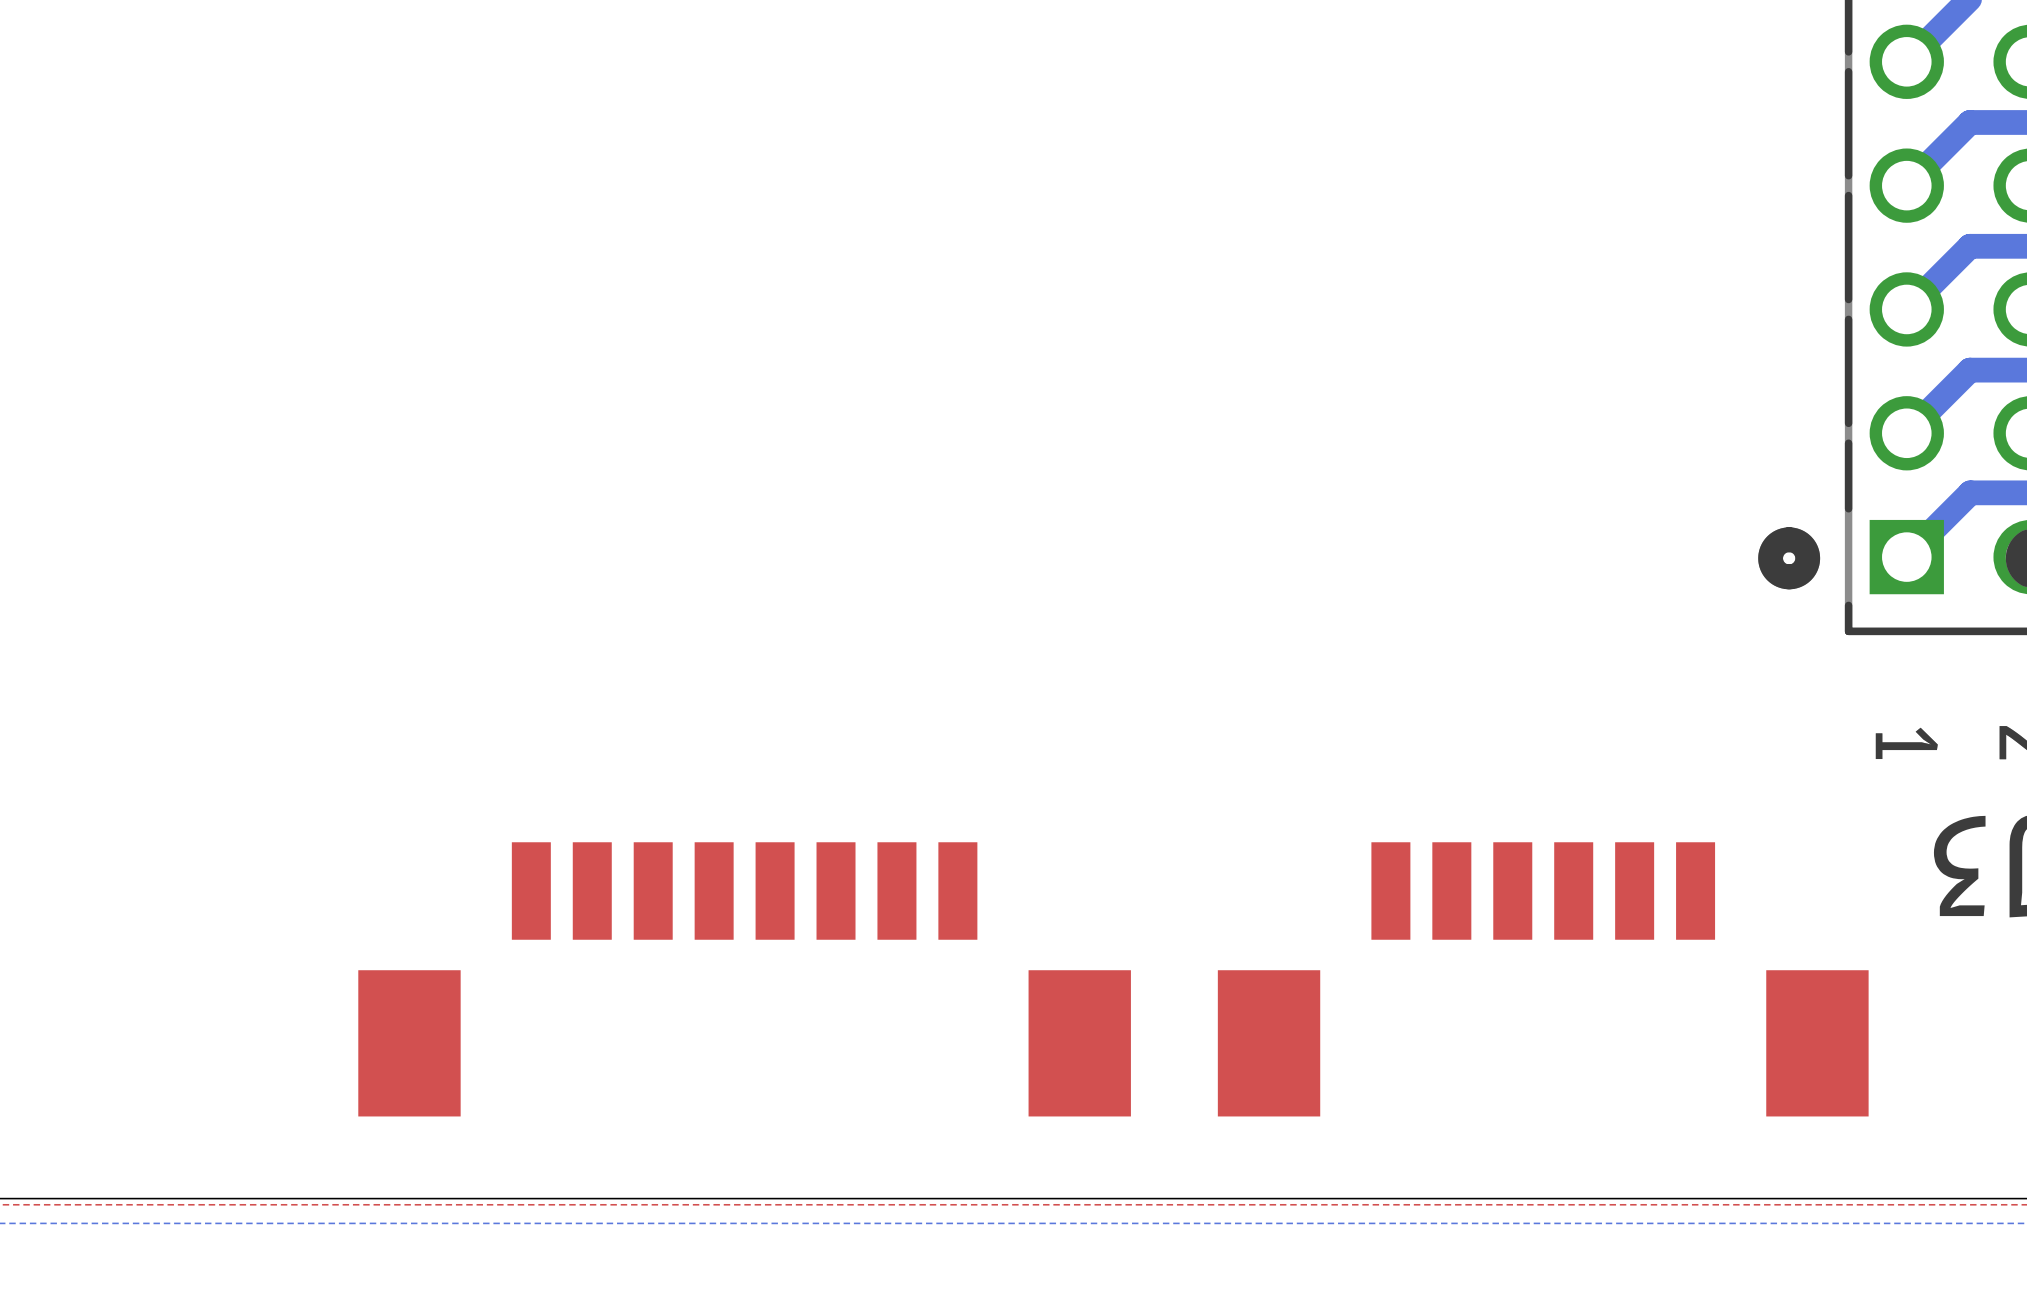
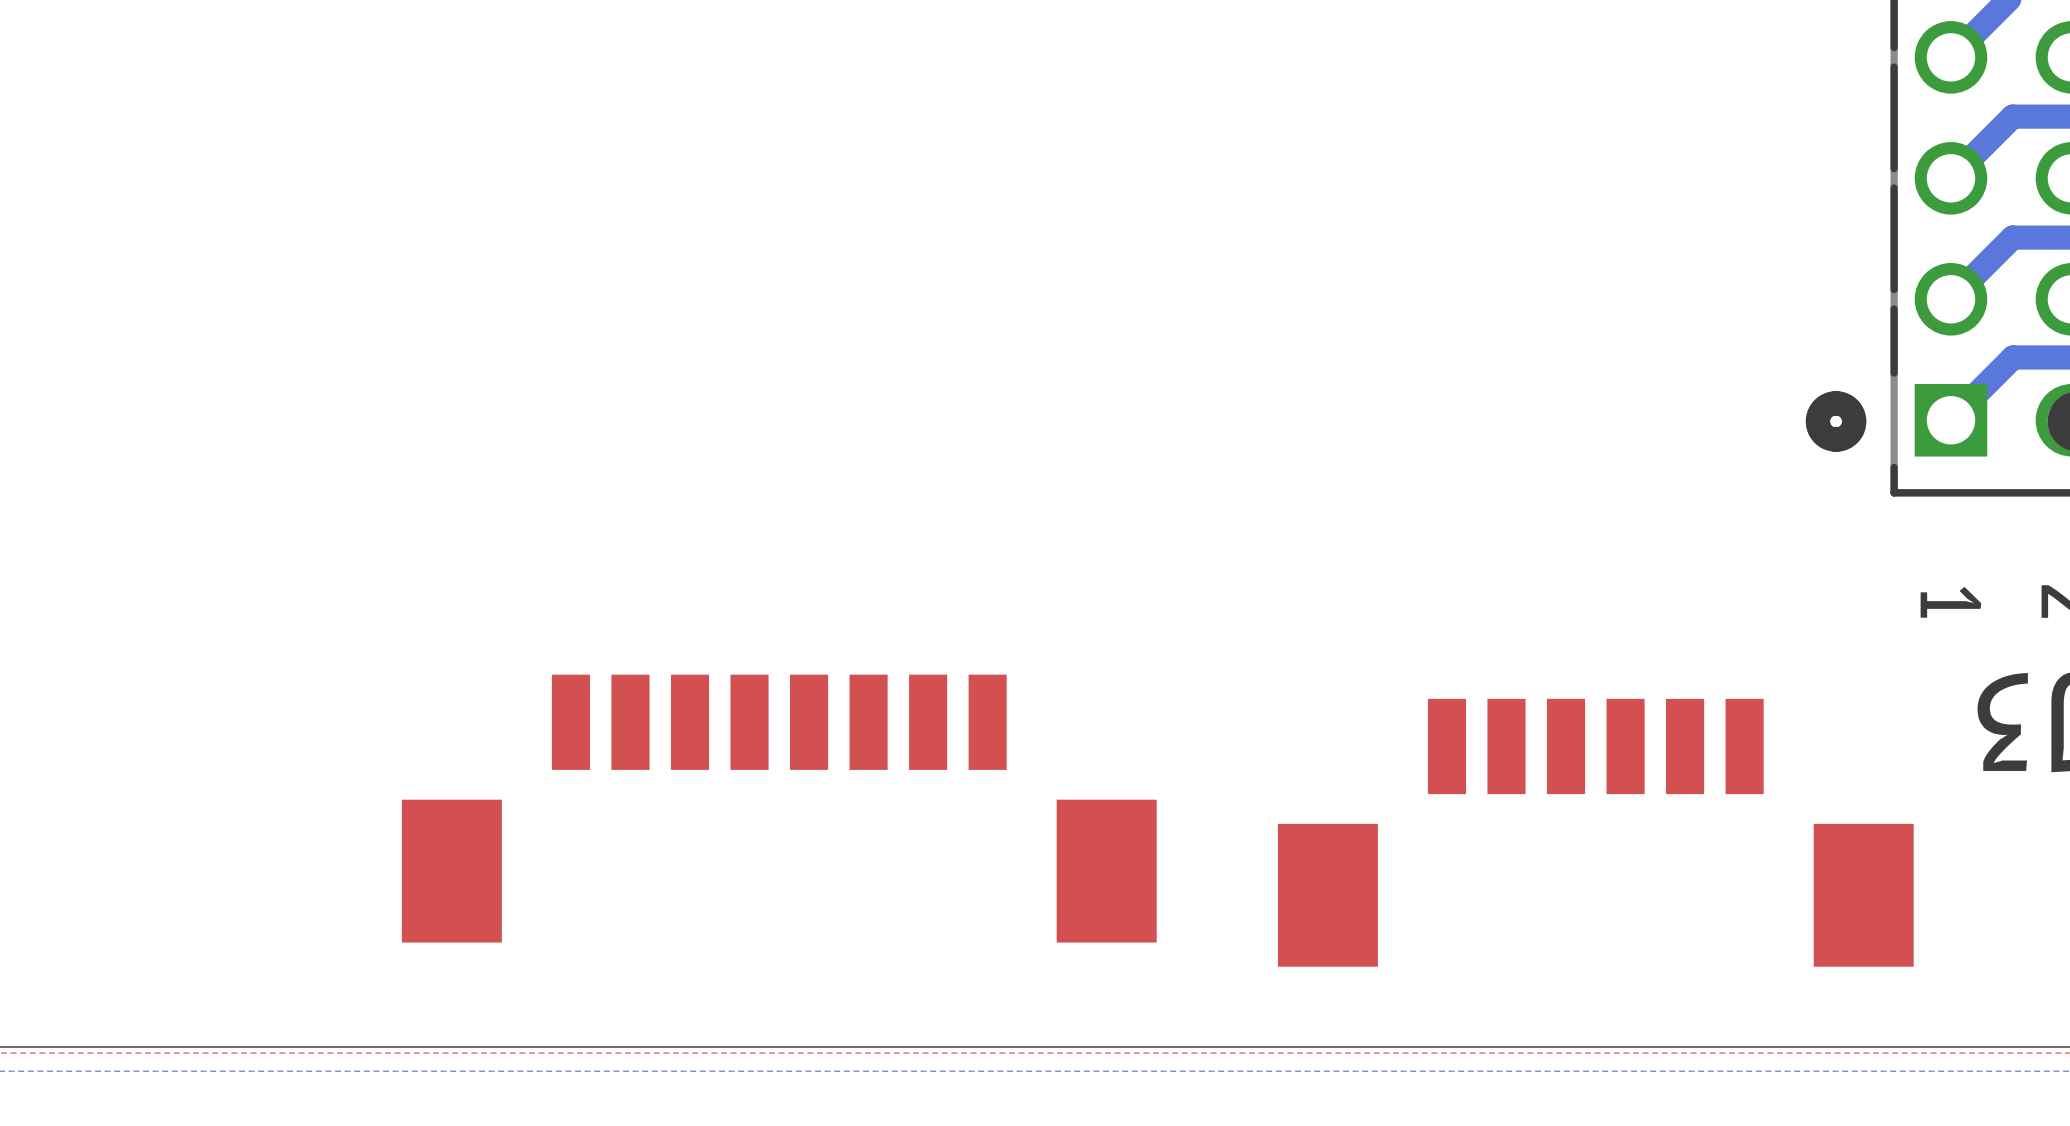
part position: (744, 979) -> (779, 808)

